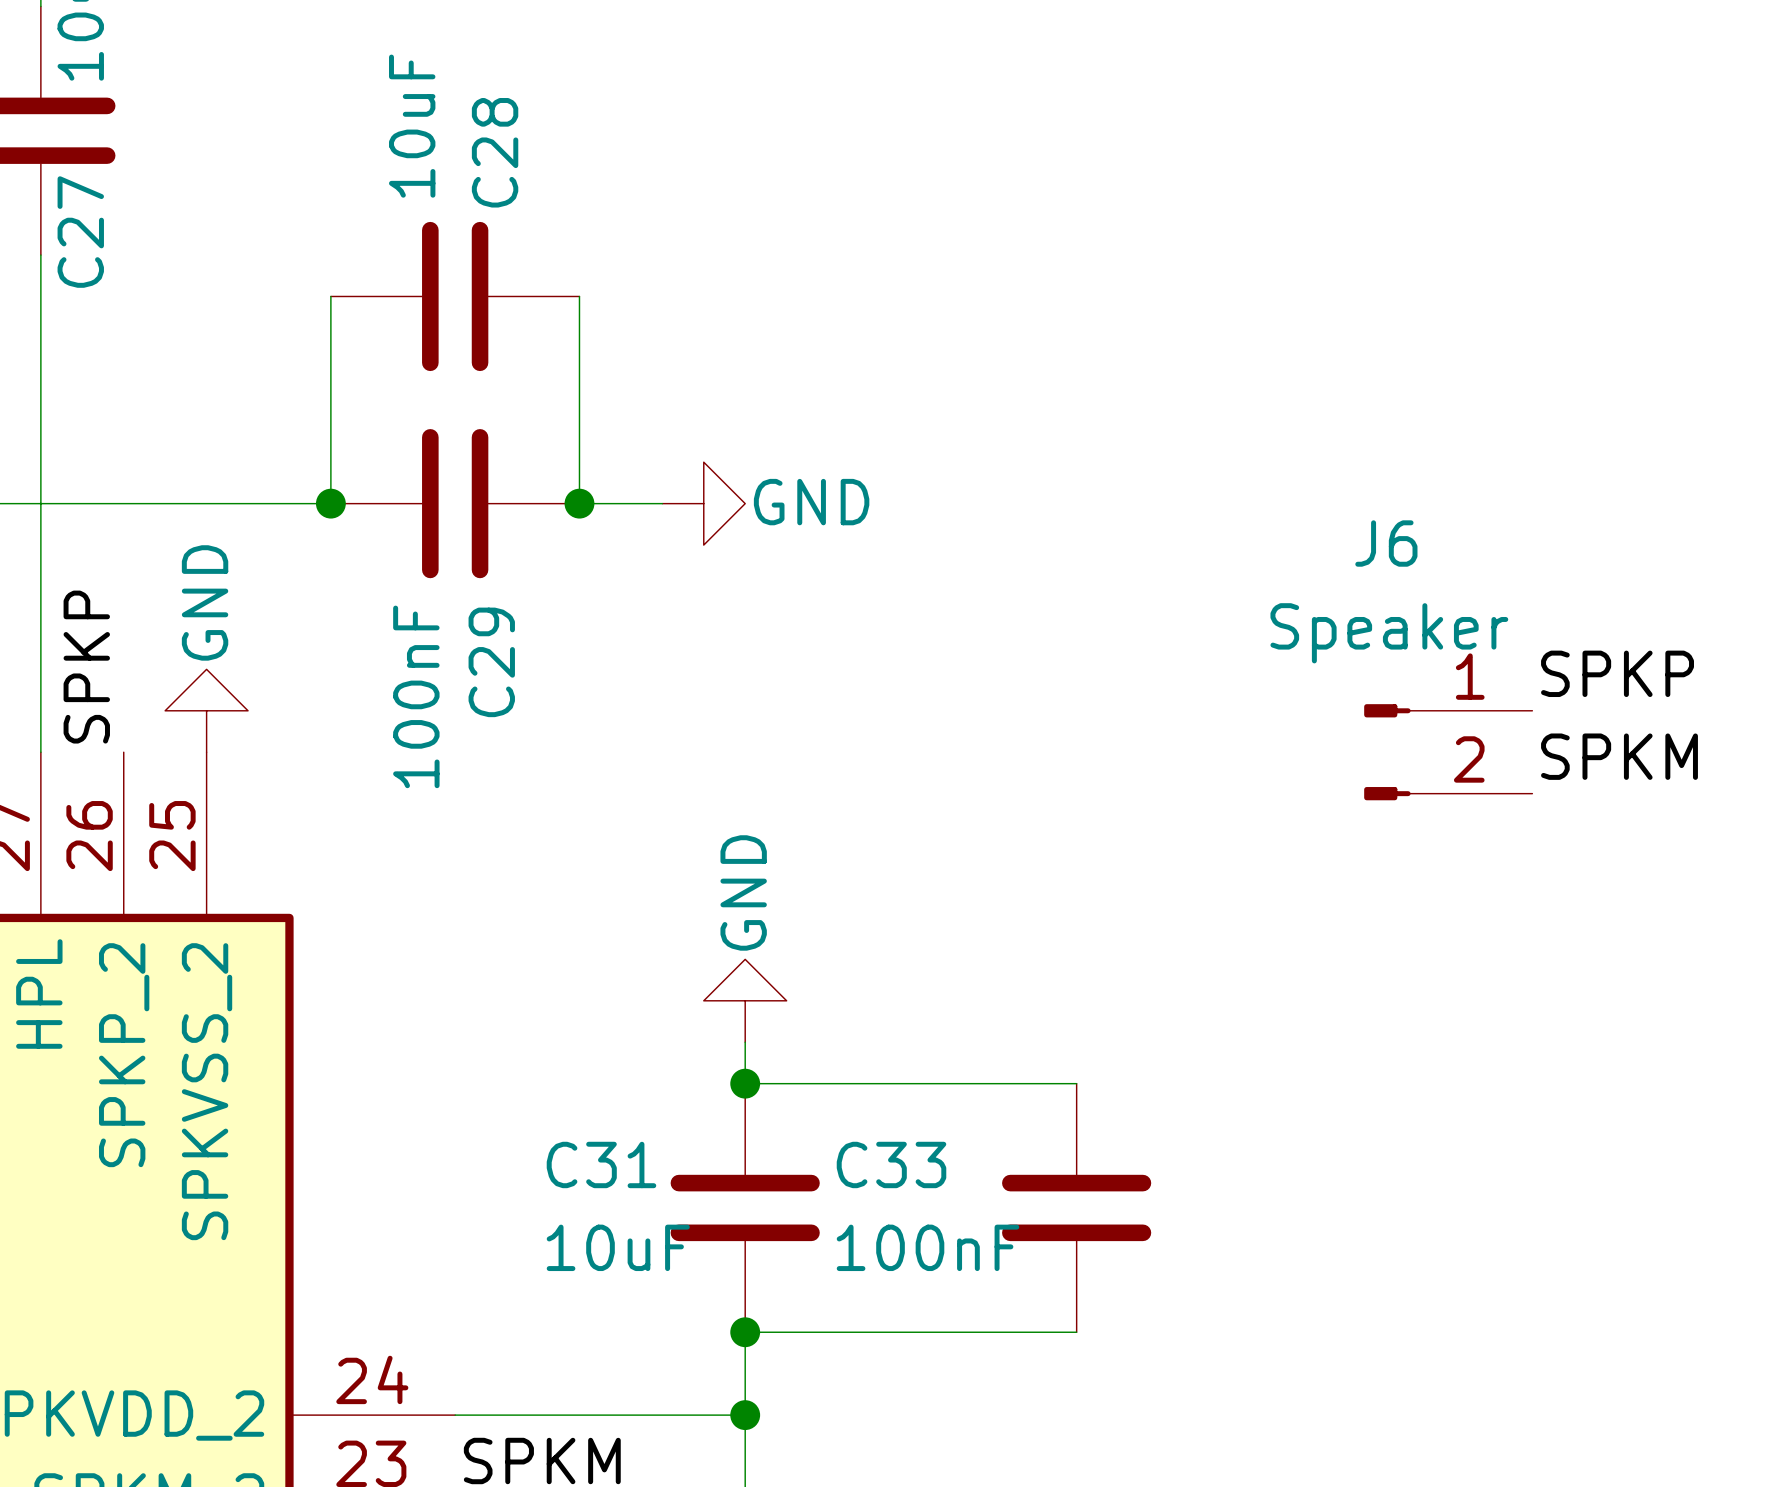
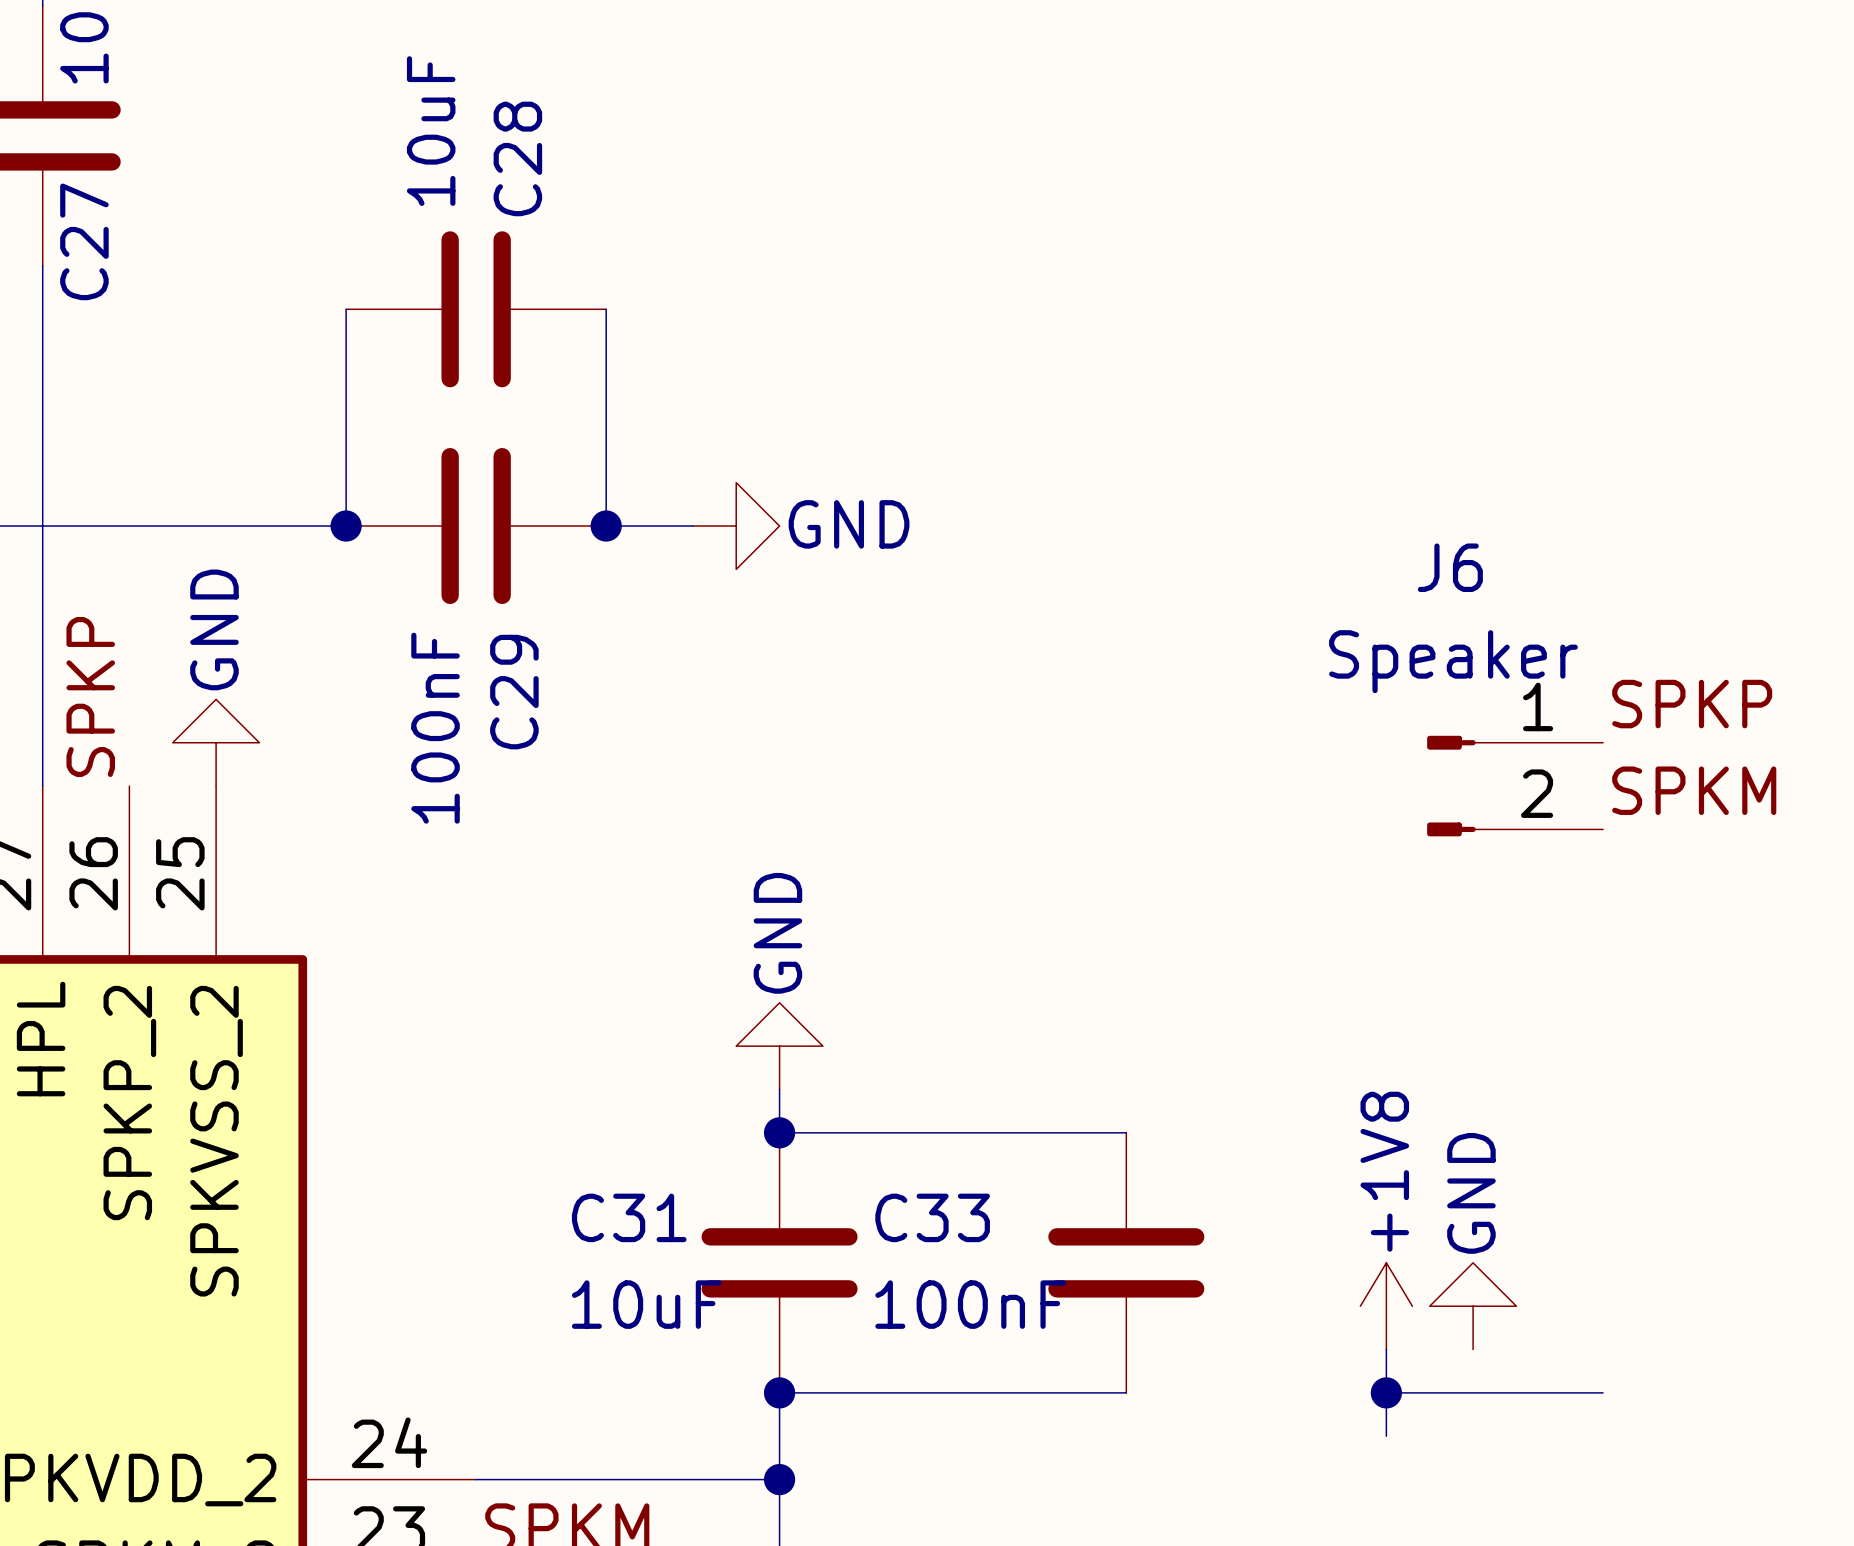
power symbol: none -> +1V8 (1386, 1306)
power symbol: none -> GND (1473, 1306)
wire: none -> (1386, 1349) (1386, 1436)
wire: none -> (1386, 1392) (1603, 1392)
junction: none -> (1386, 1392)

